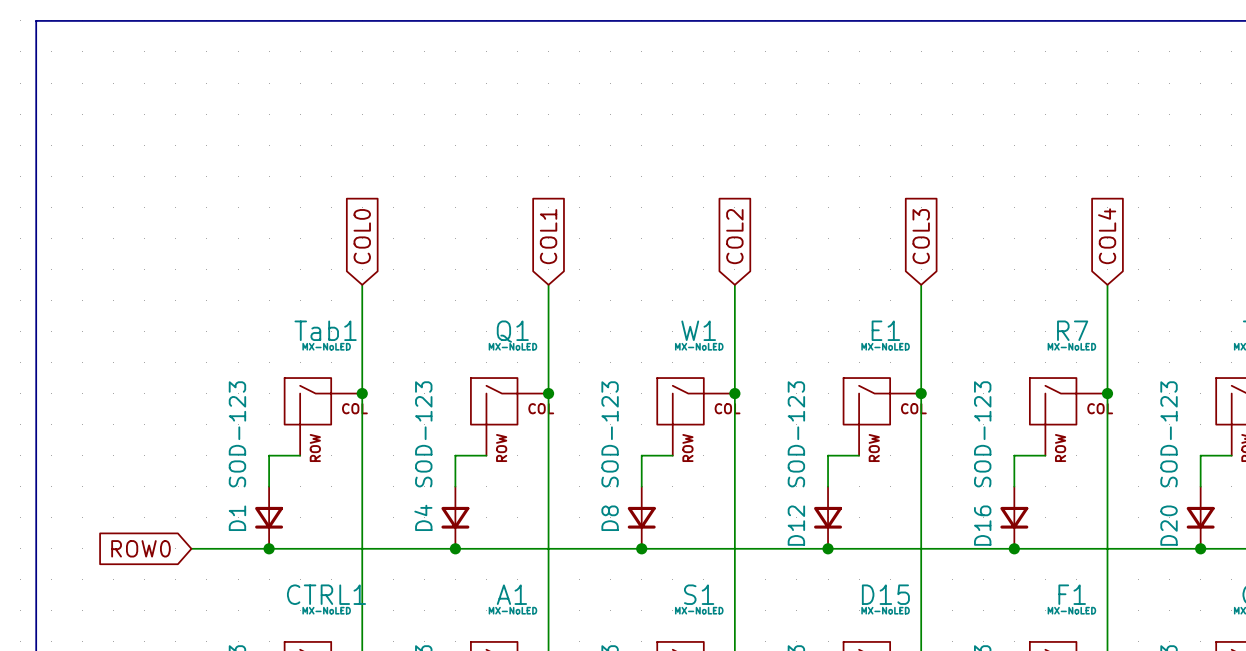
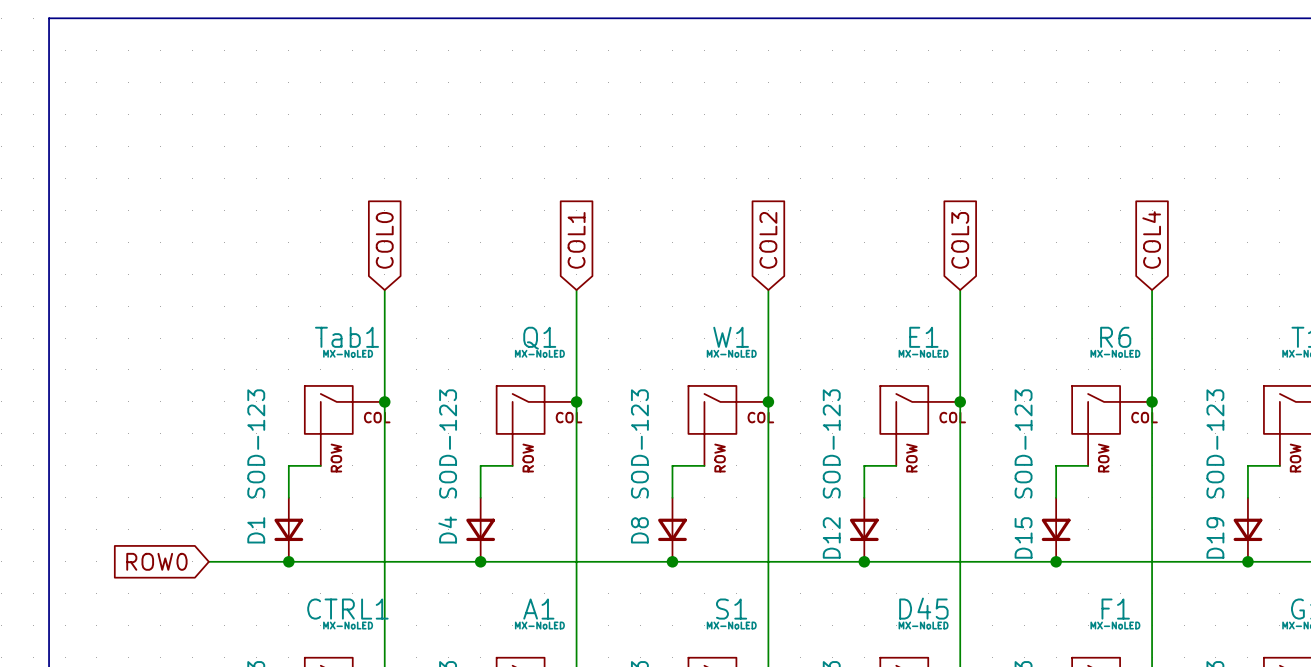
R7 name: R7 (1072, 330) -> R6 (1115, 337)
D16 name: D16 (982, 525) -> D15 (1023, 537)
D20 name: D20 (1169, 525) -> D19 (1215, 537)
D15 name: D15 (885, 594) -> D45 (923, 608)

